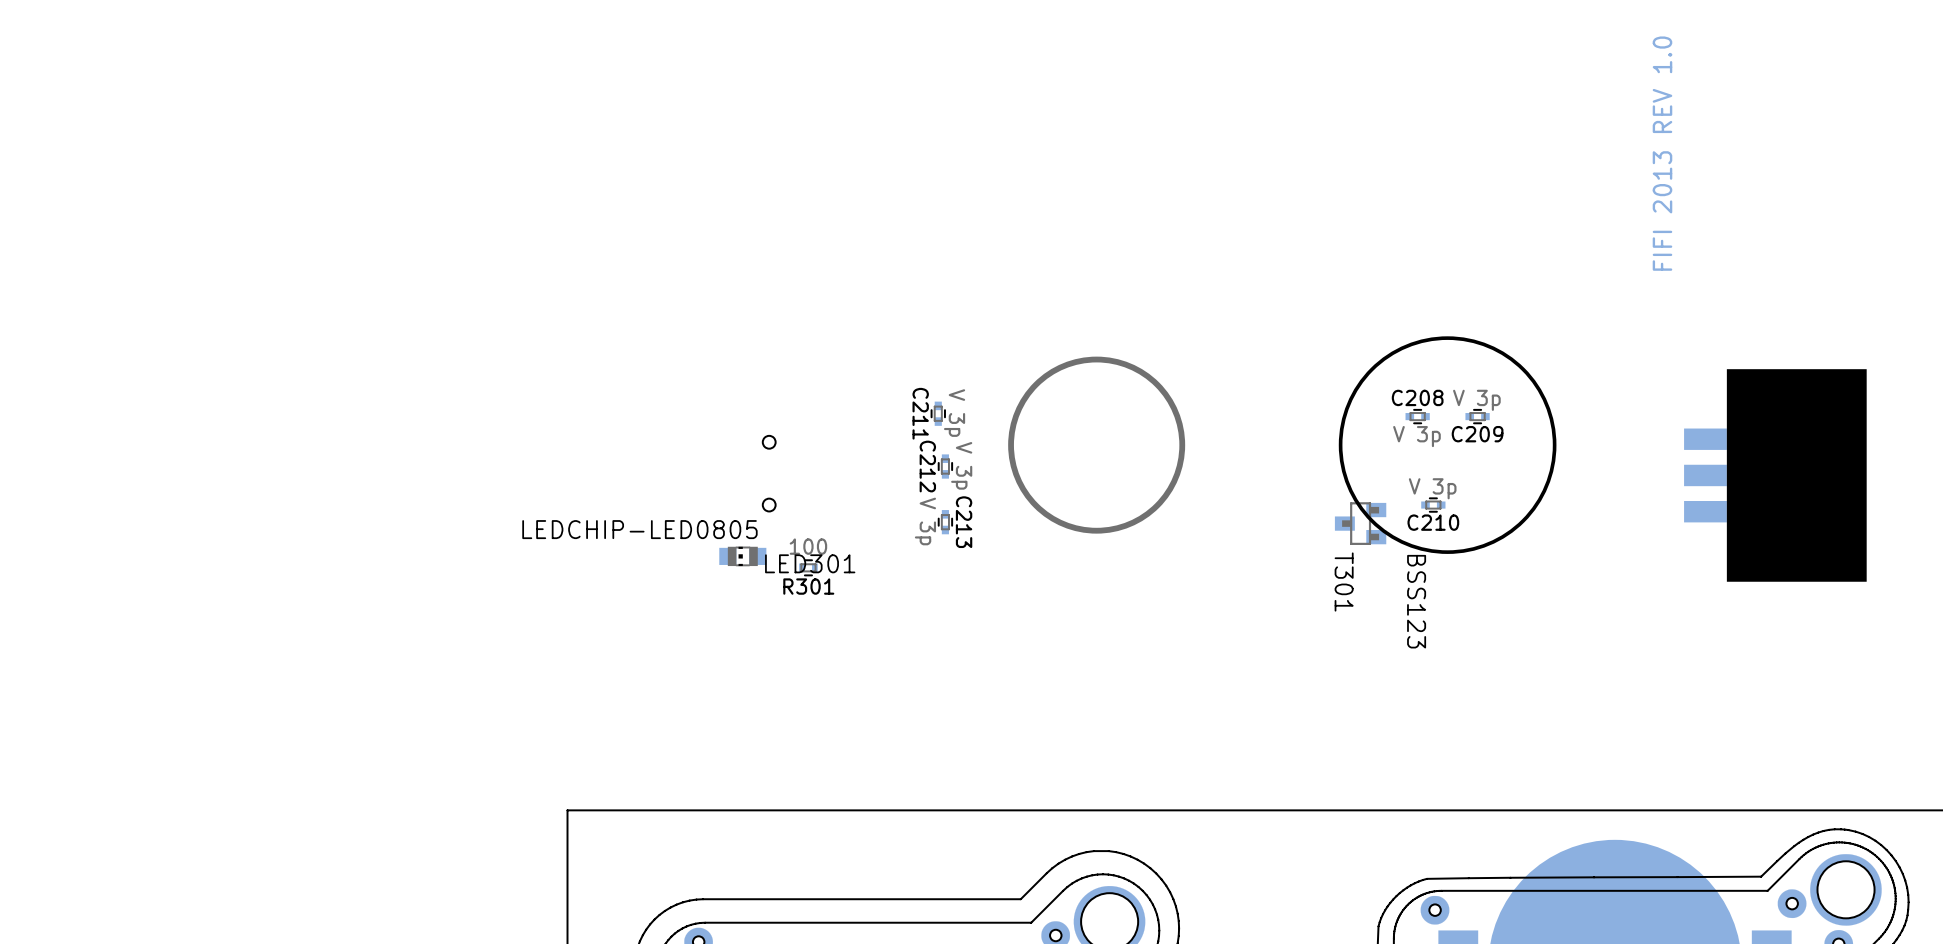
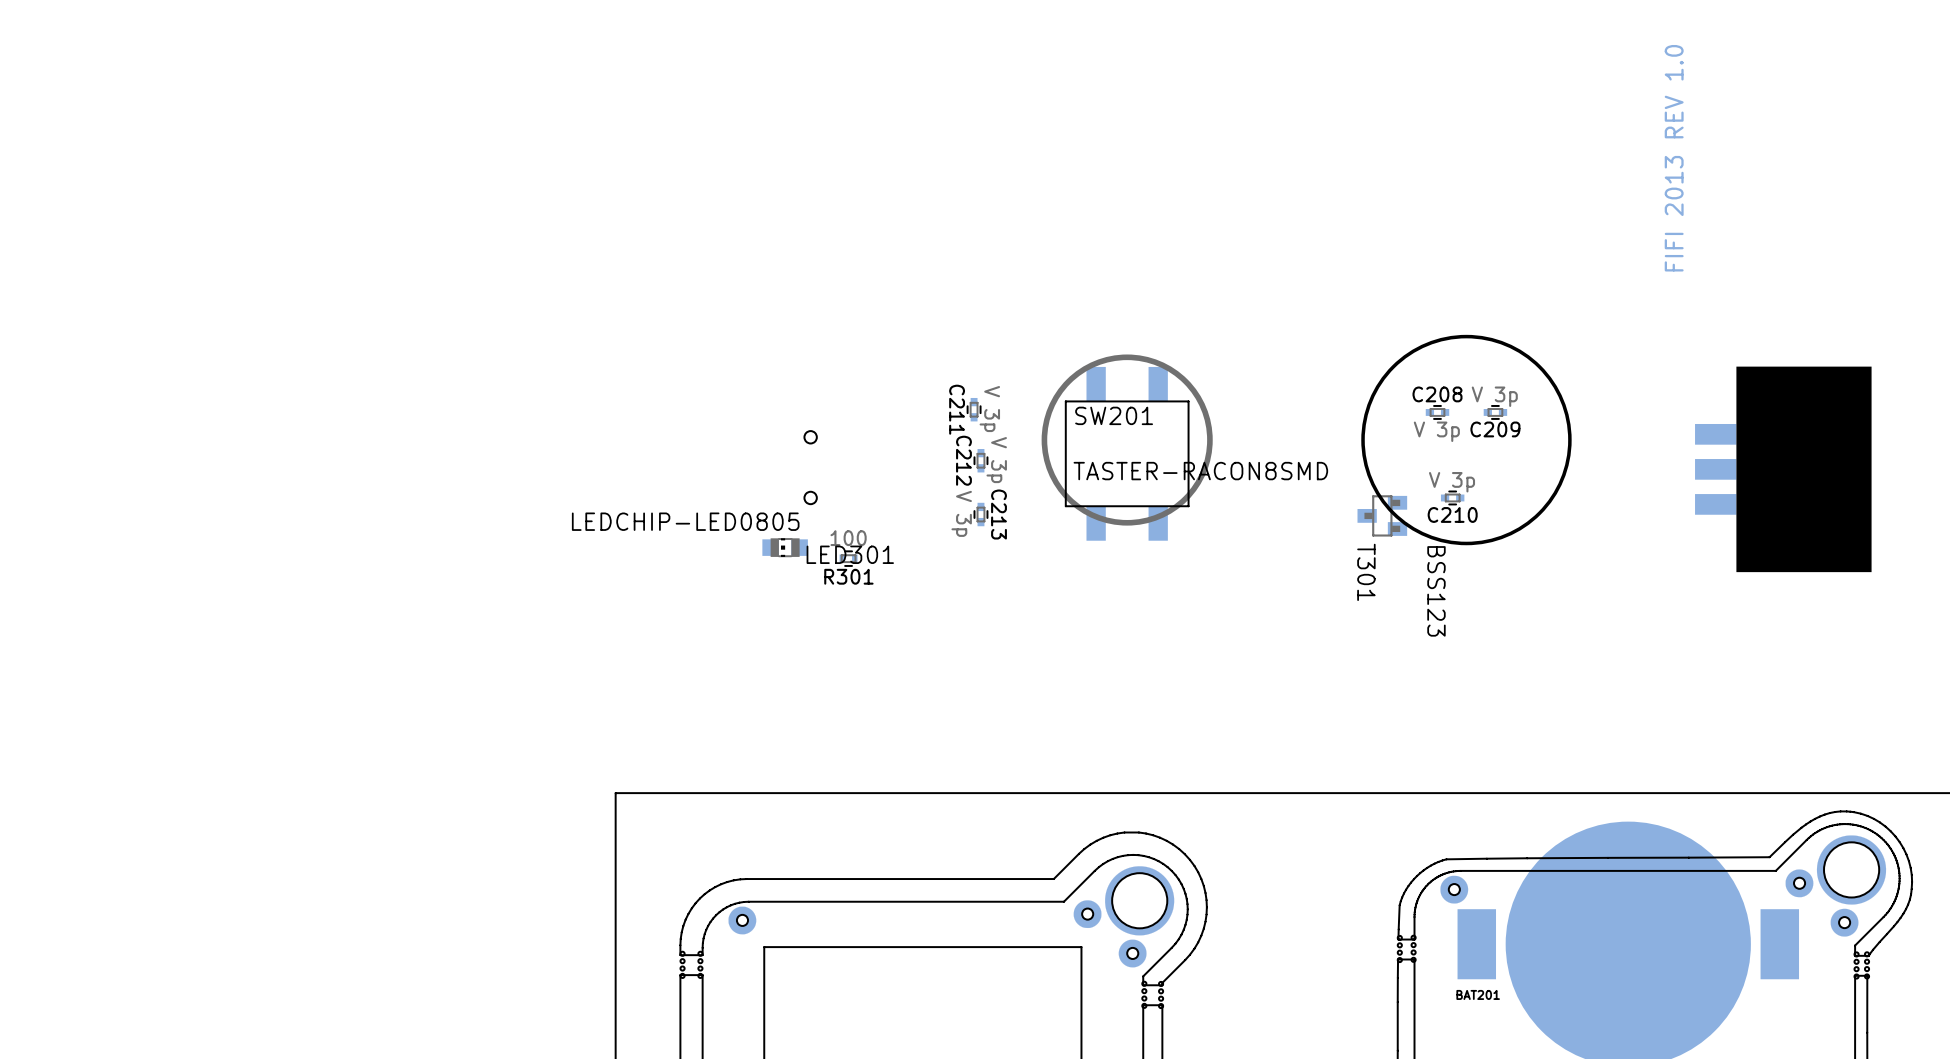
SW201: none -> TASTER-RACON8SMD (1127, 453)

